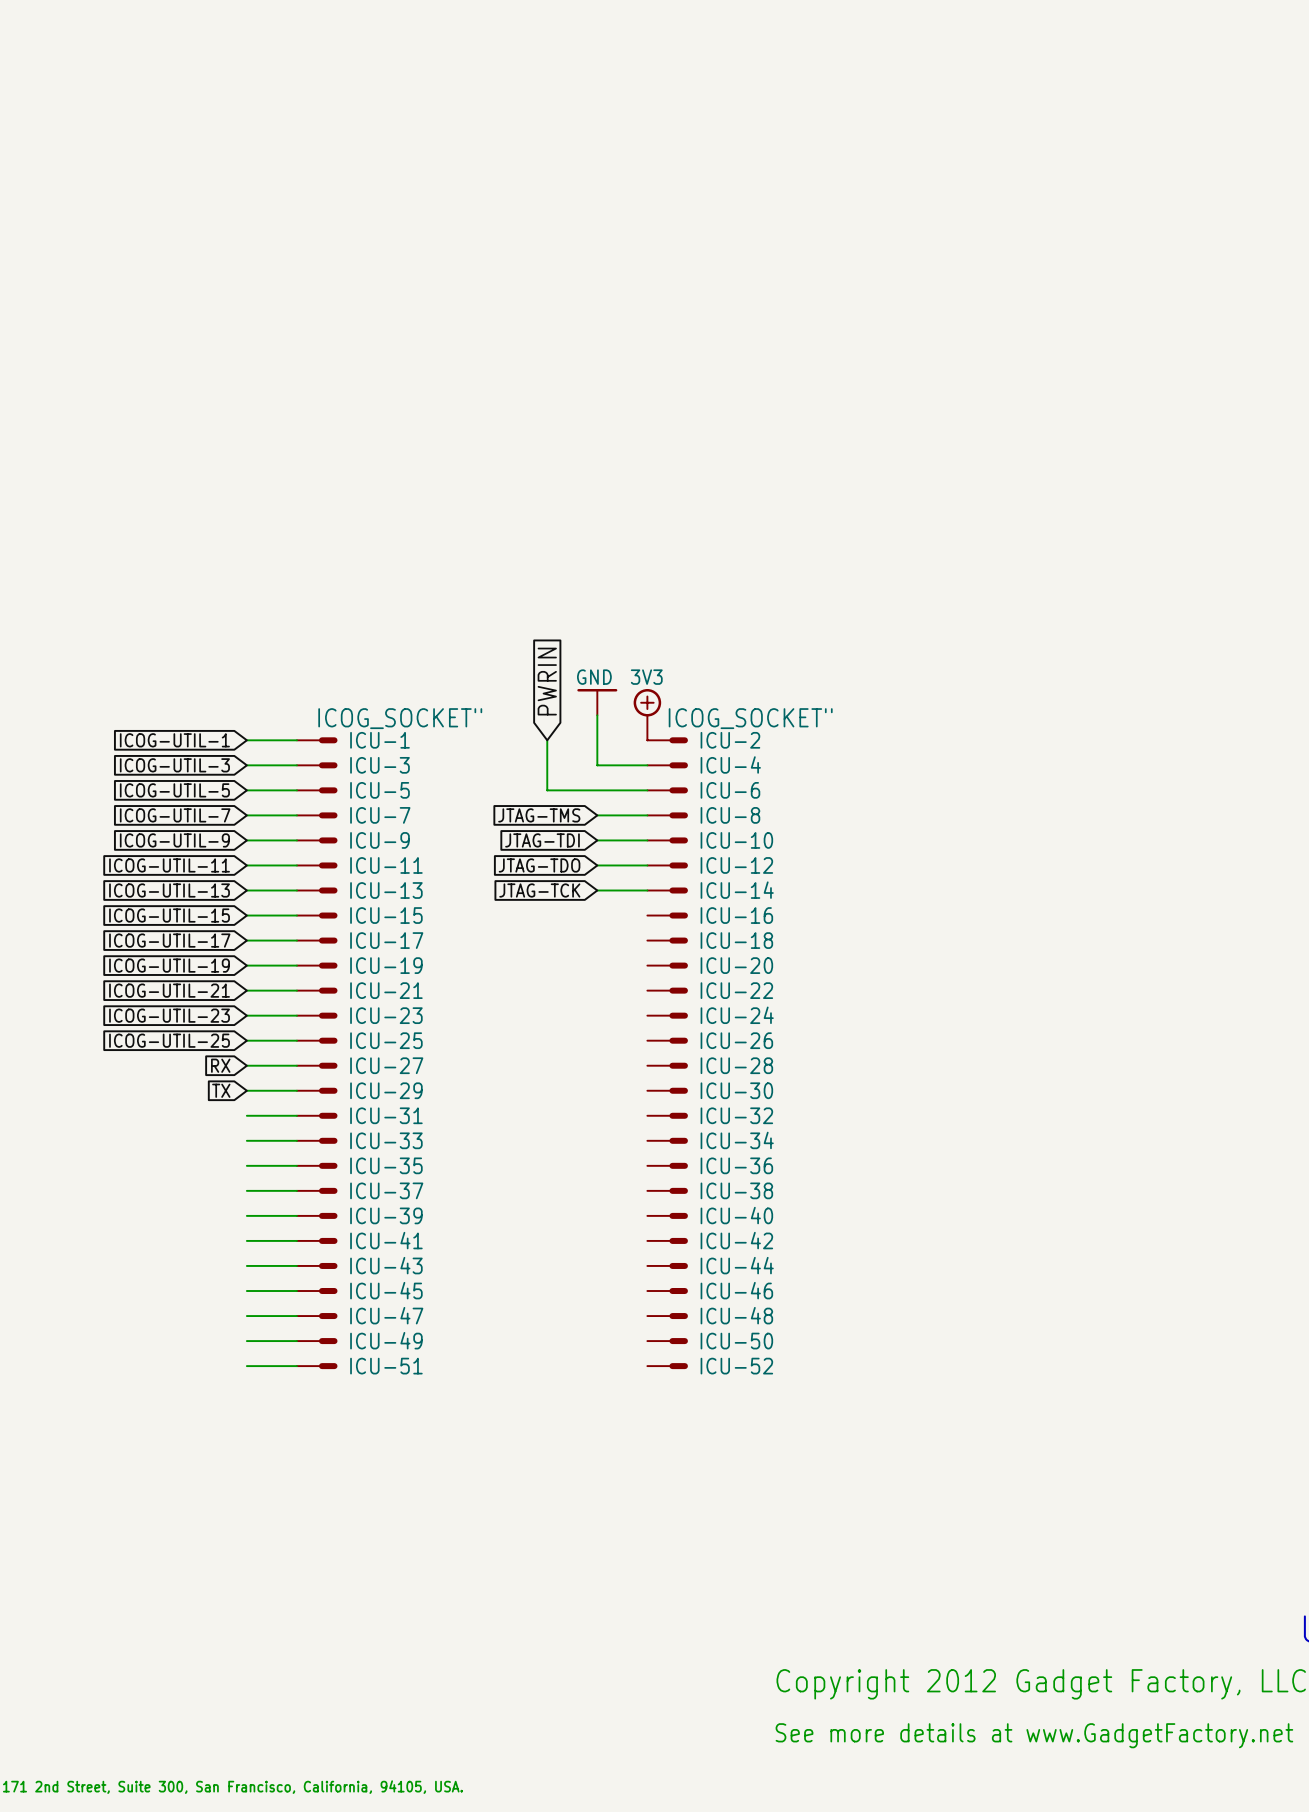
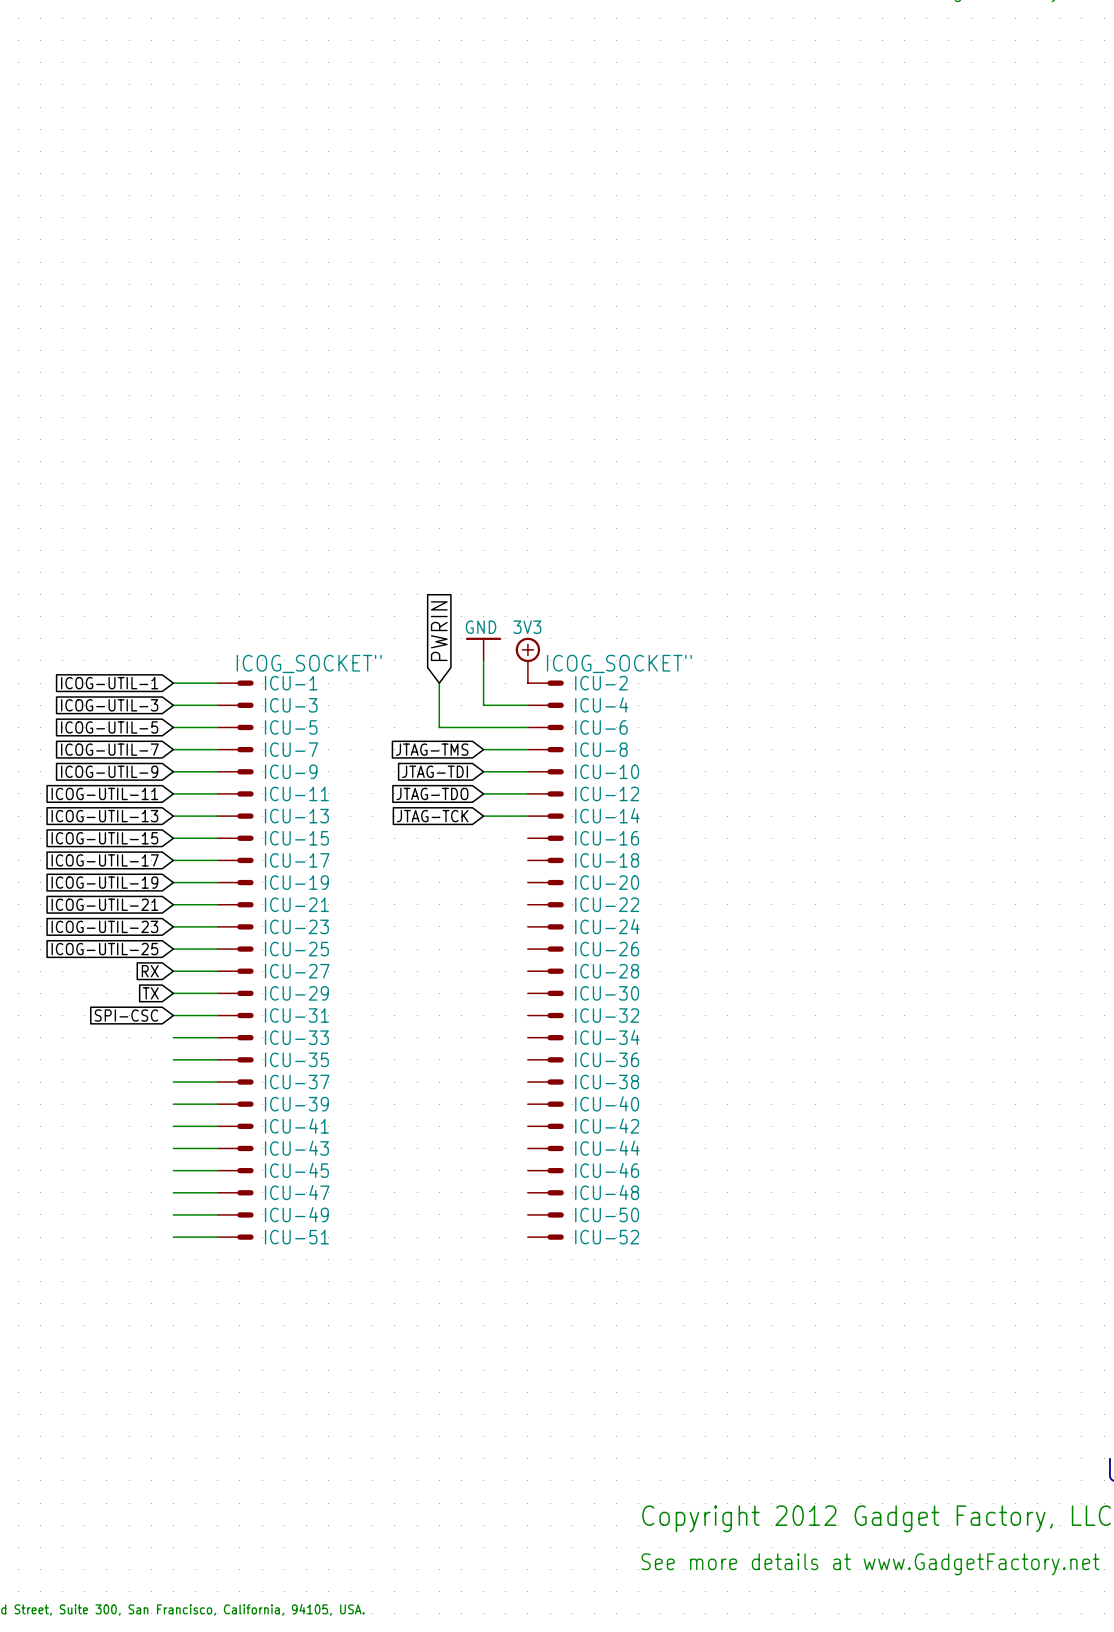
global label: none -> SPI-CSC (126, 1015)

